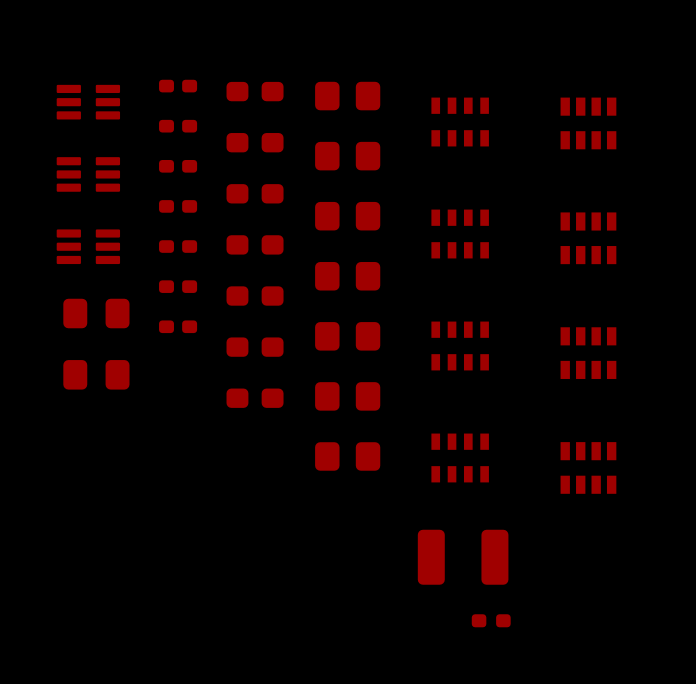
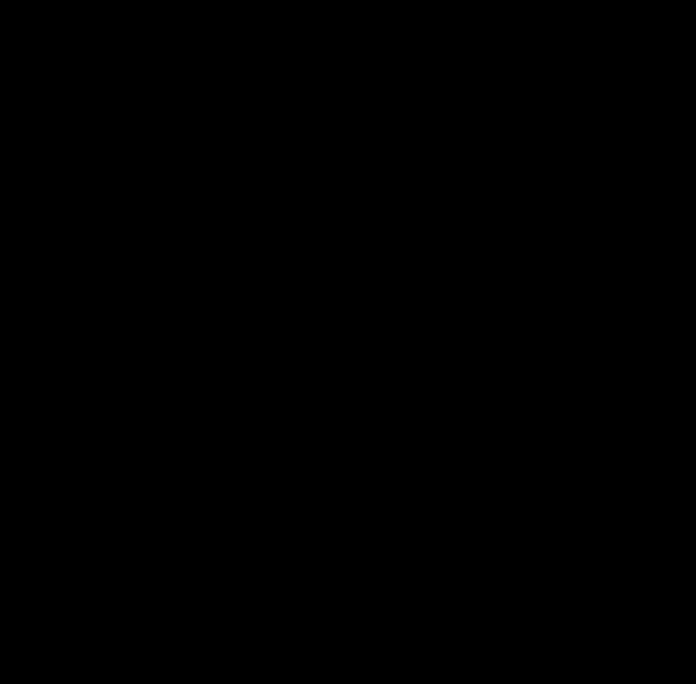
part: (178, 86) -> none
part: (255, 91) -> none
part: (347, 96) -> none
part: (88, 102) -> none
part: (460, 122) -> none
part: (588, 123) -> none
part: (178, 126) -> none
part: (255, 142) -> none
part: (347, 156) -> none
part: (178, 166) -> none
part: (88, 174) -> none
part: (255, 193) -> none
part: (178, 206) -> none
part: (347, 216) -> none
part: (460, 234) -> none
part: (588, 238) -> none
part: (255, 244) -> none
part: (88, 246) -> none
part: (178, 246) -> none
part: (347, 276) -> none
part: (178, 286) -> none
part: (255, 296) -> none
part: (96, 313) -> none
part: (178, 326) -> none
part: (347, 336) -> none
part: (460, 346) -> none
part: (255, 347) -> none
part: (588, 353) -> none
part: (96, 374) -> none
part: (347, 396) -> none
part: (255, 398) -> none
part: (347, 456) -> none
part: (460, 457) -> none
part: (588, 467) -> none
part: (463, 557) -> none
part: (491, 620) -> none

